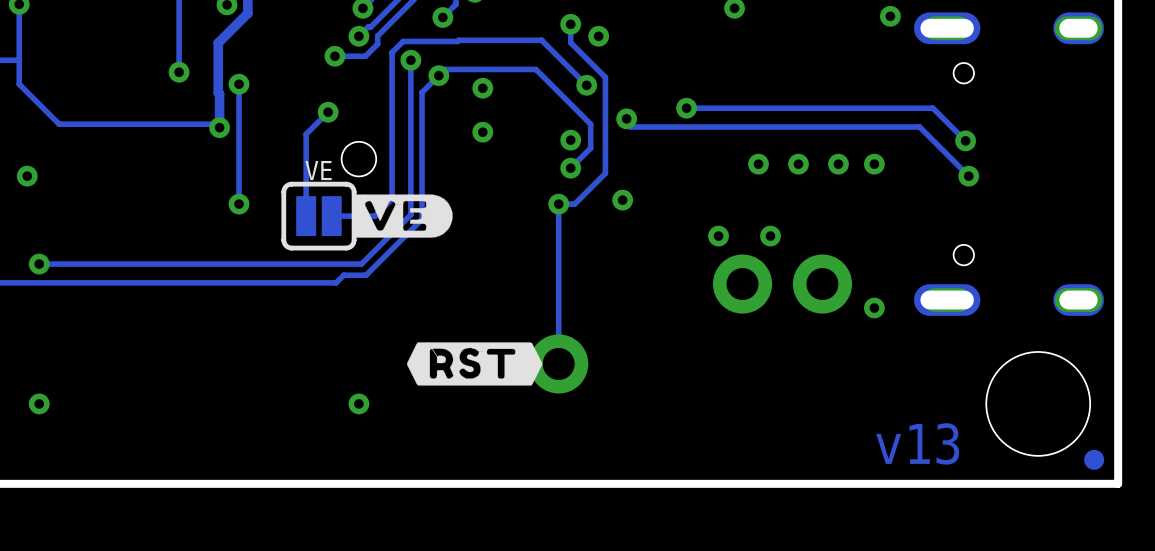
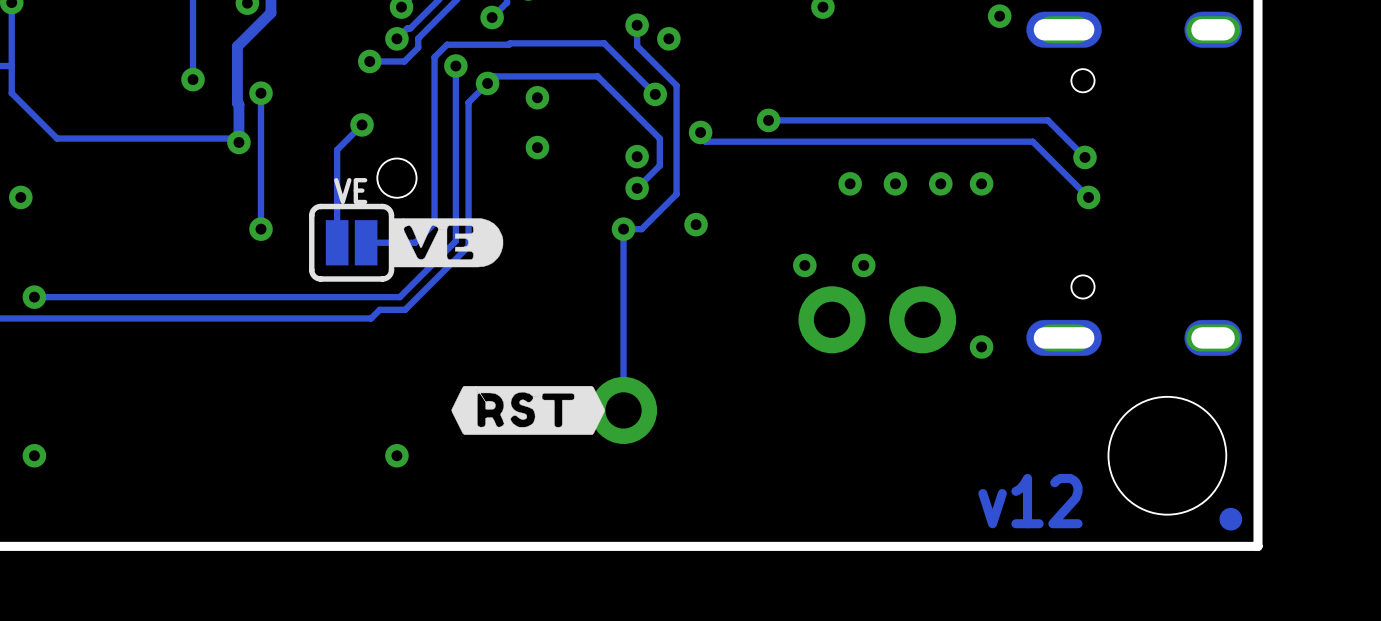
text: v13 (917, 443) -> v12 (1030, 501)

